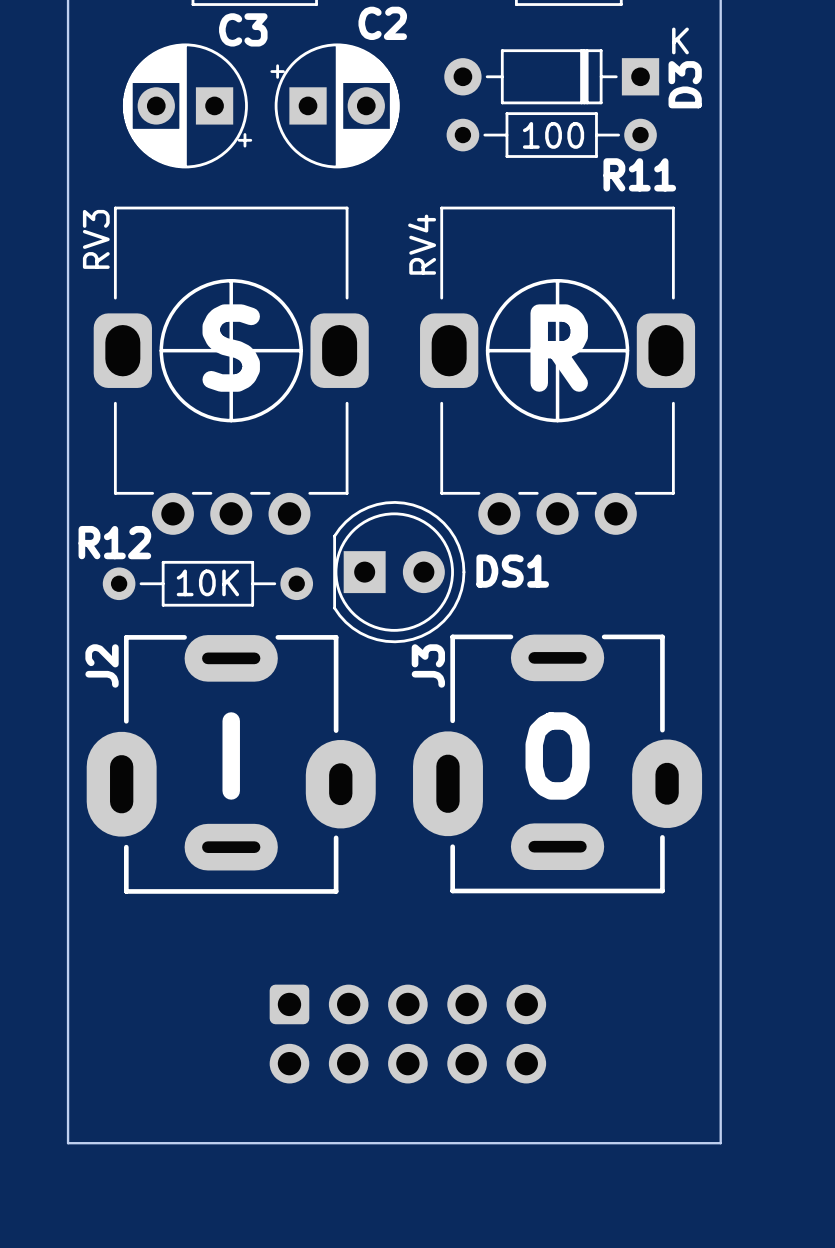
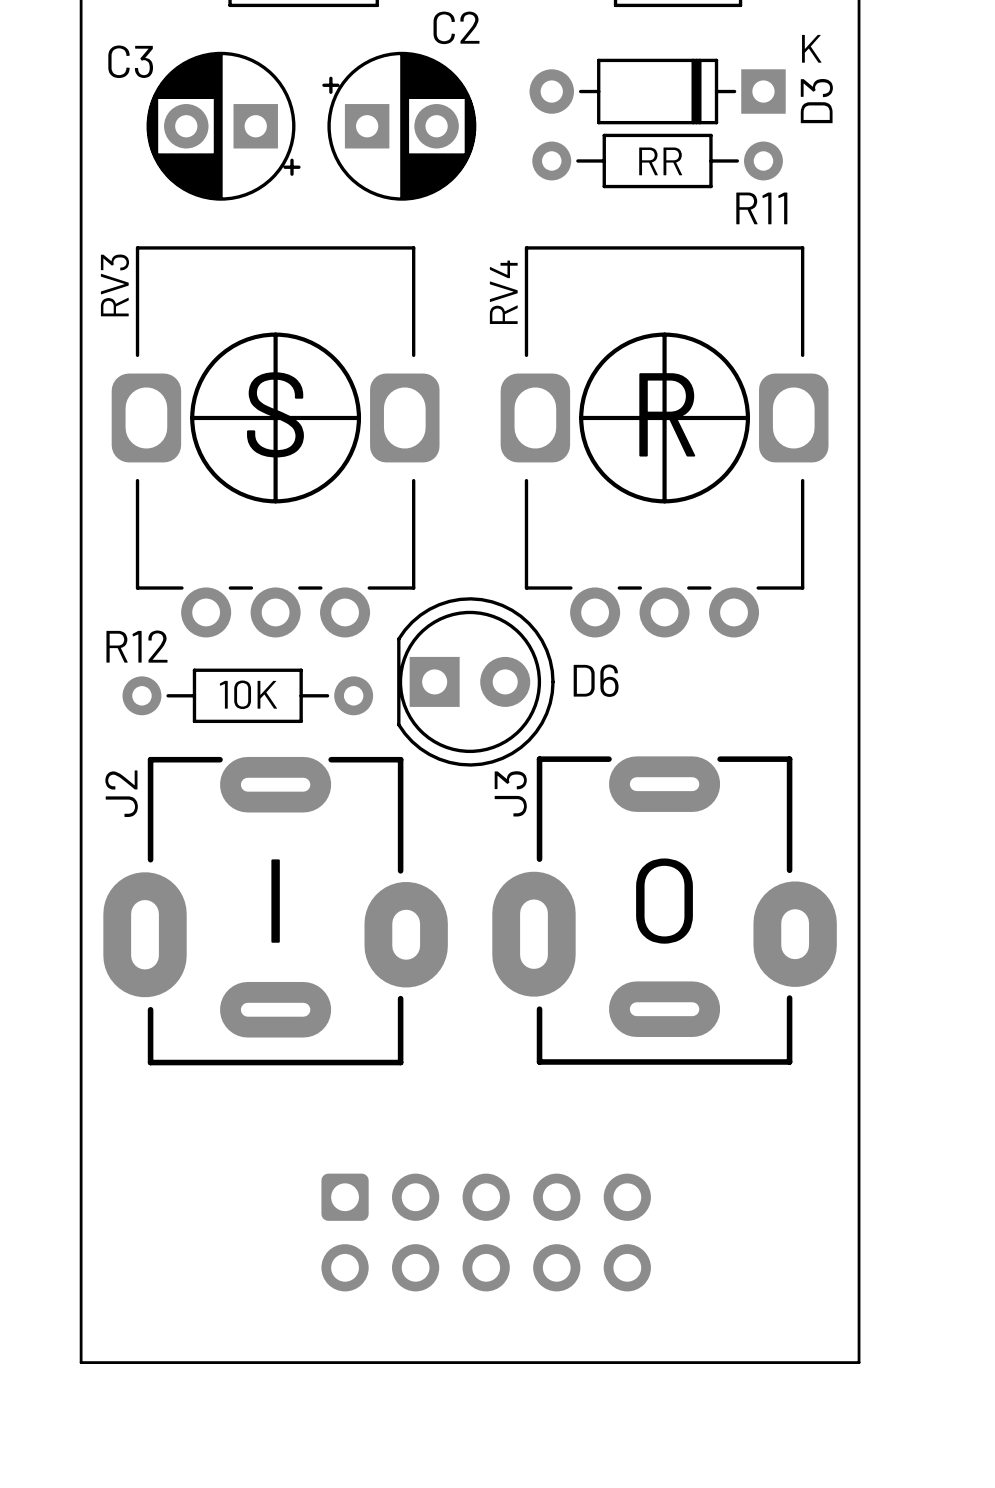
C3 name position: C3 (243, 29) -> C3 (130, 61)
R11 value: 100 (553, 135) -> RR (660, 161)
DS1 name: DS1 (512, 571) -> D6 (596, 680)

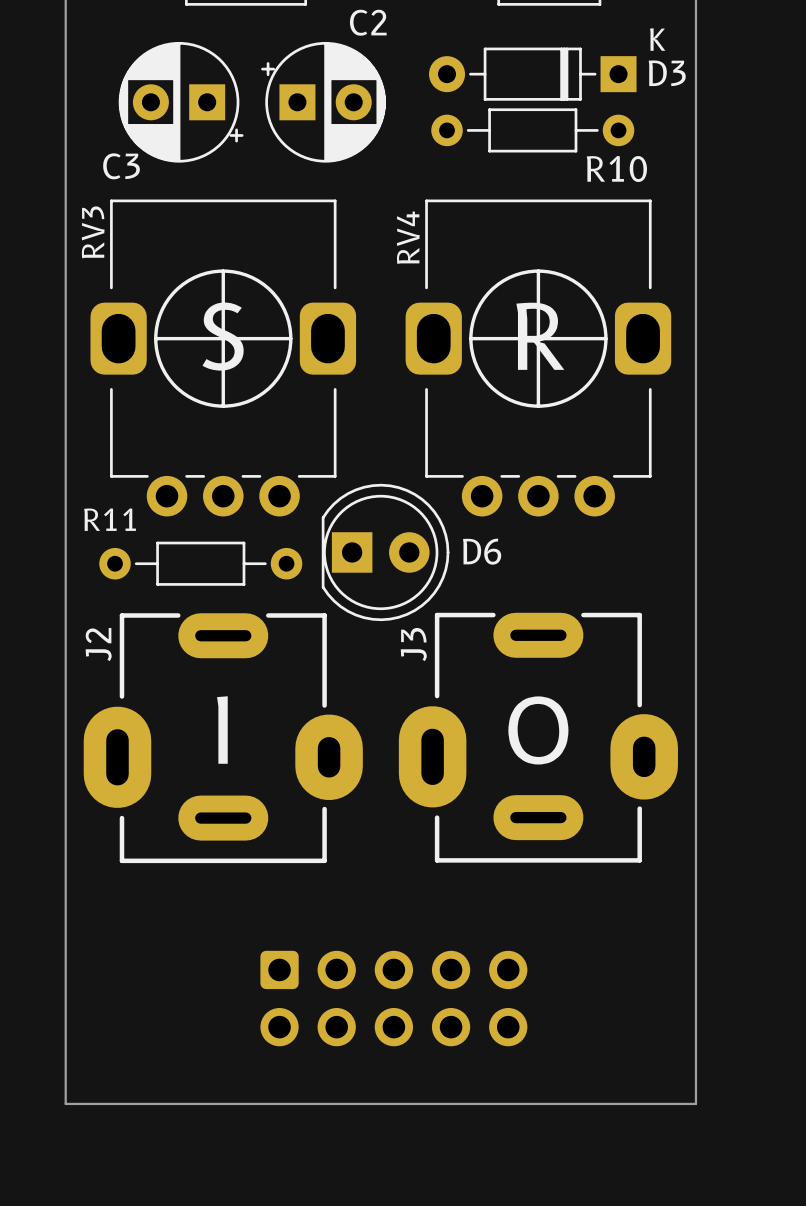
C3 name position: C3 (130, 61) -> C3 (121, 166)
D3 name rotation: 0° (816, 101) -> 90° clockwise (667, 73)
R11 value: RR (660, 161) -> none
R11 name: R11 (761, 208) -> R10 (616, 168)
R12 name: R12 (136, 646) -> R11 (110, 519)
R12 value: 10K (248, 694) -> none

